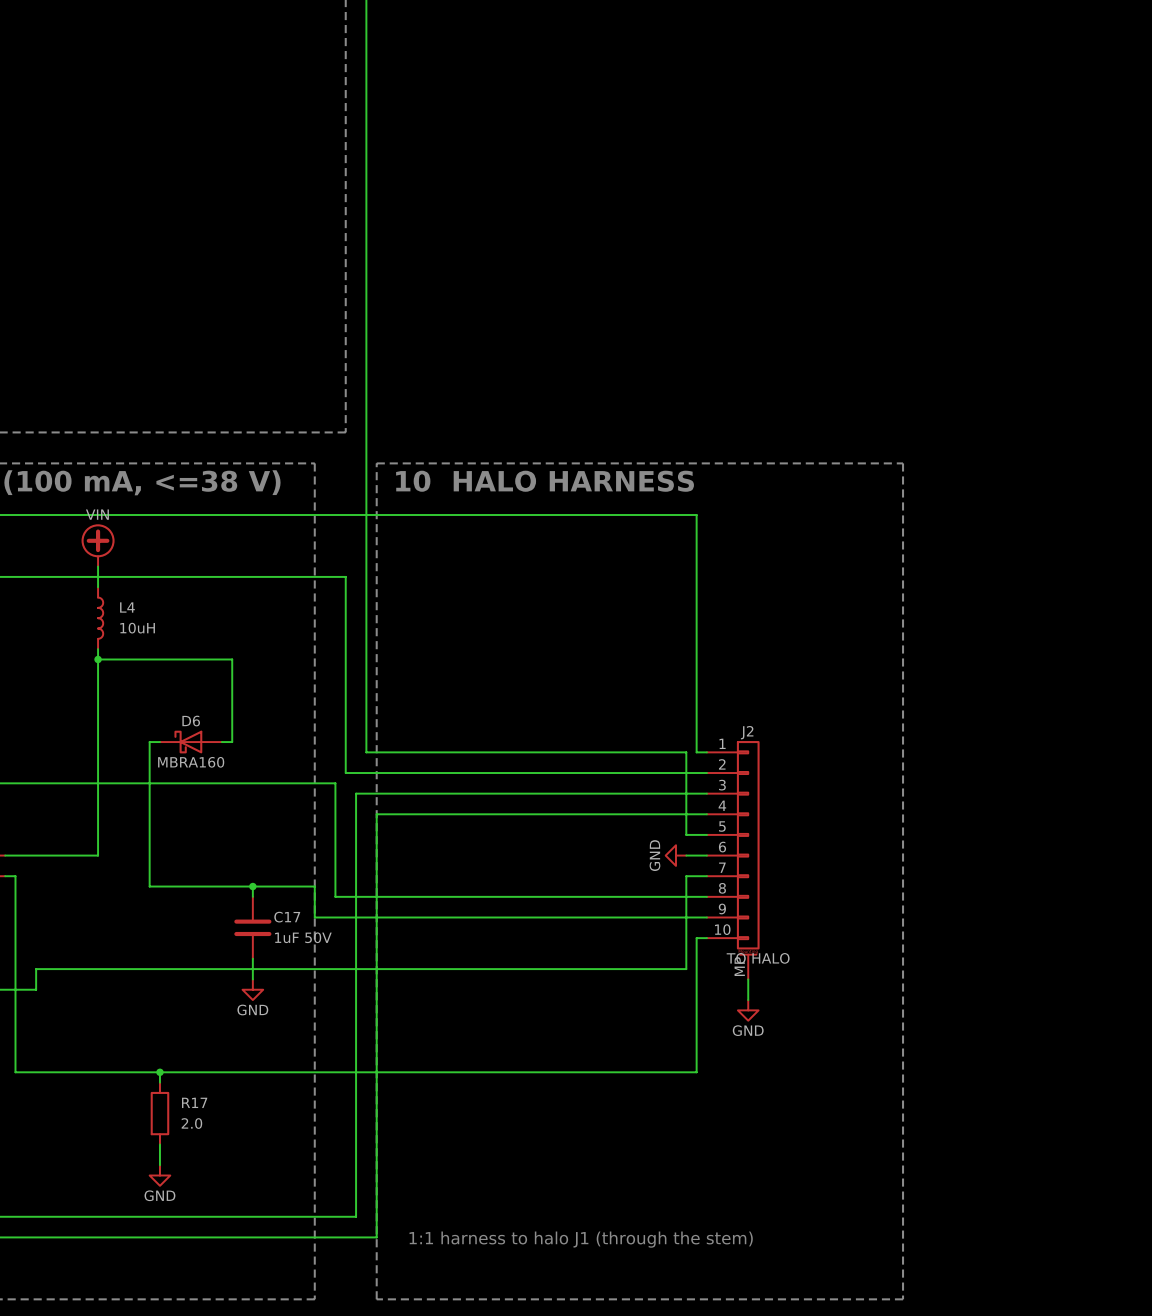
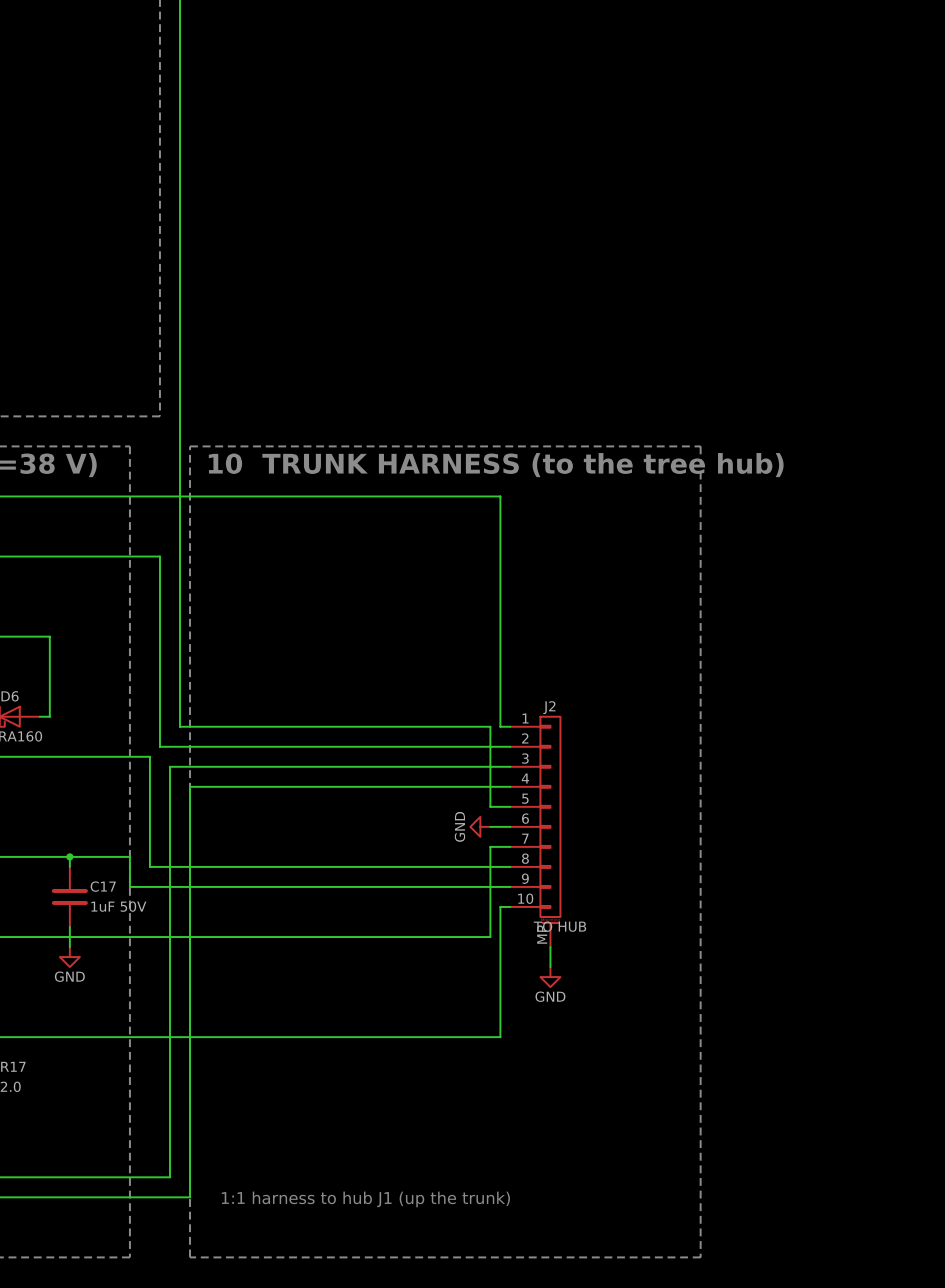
text: 10 HALO HARNESS (545, 481) -> 10 TRUNK HARNESS (to the tree hub) (496, 465)
J2 value: TO HALO (758, 958) -> TO HUB (559, 926)
text: 1:1 harness to halo J1 (through the stem) (581, 1239) -> 1:1 harness to hub J1 (up the trunk) (365, 1199)

